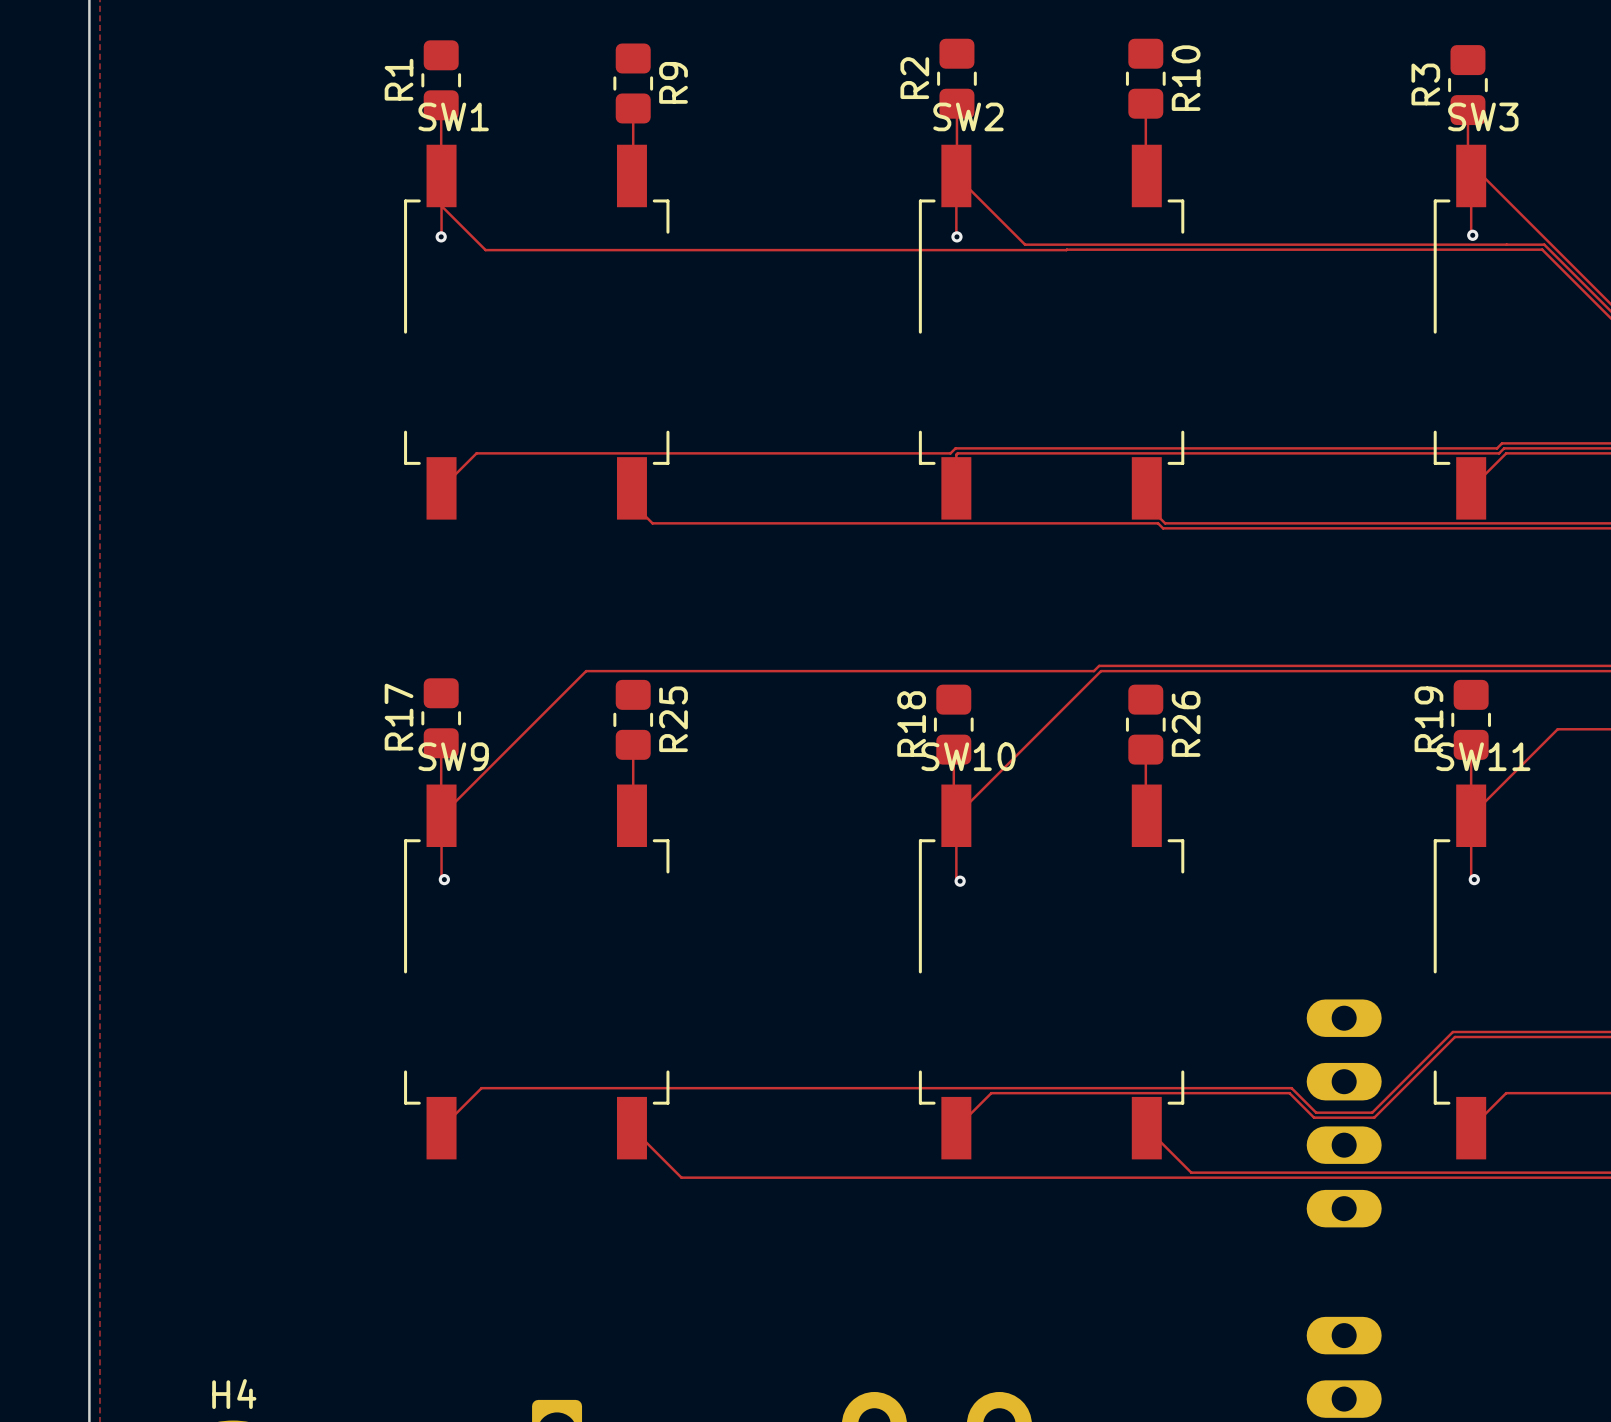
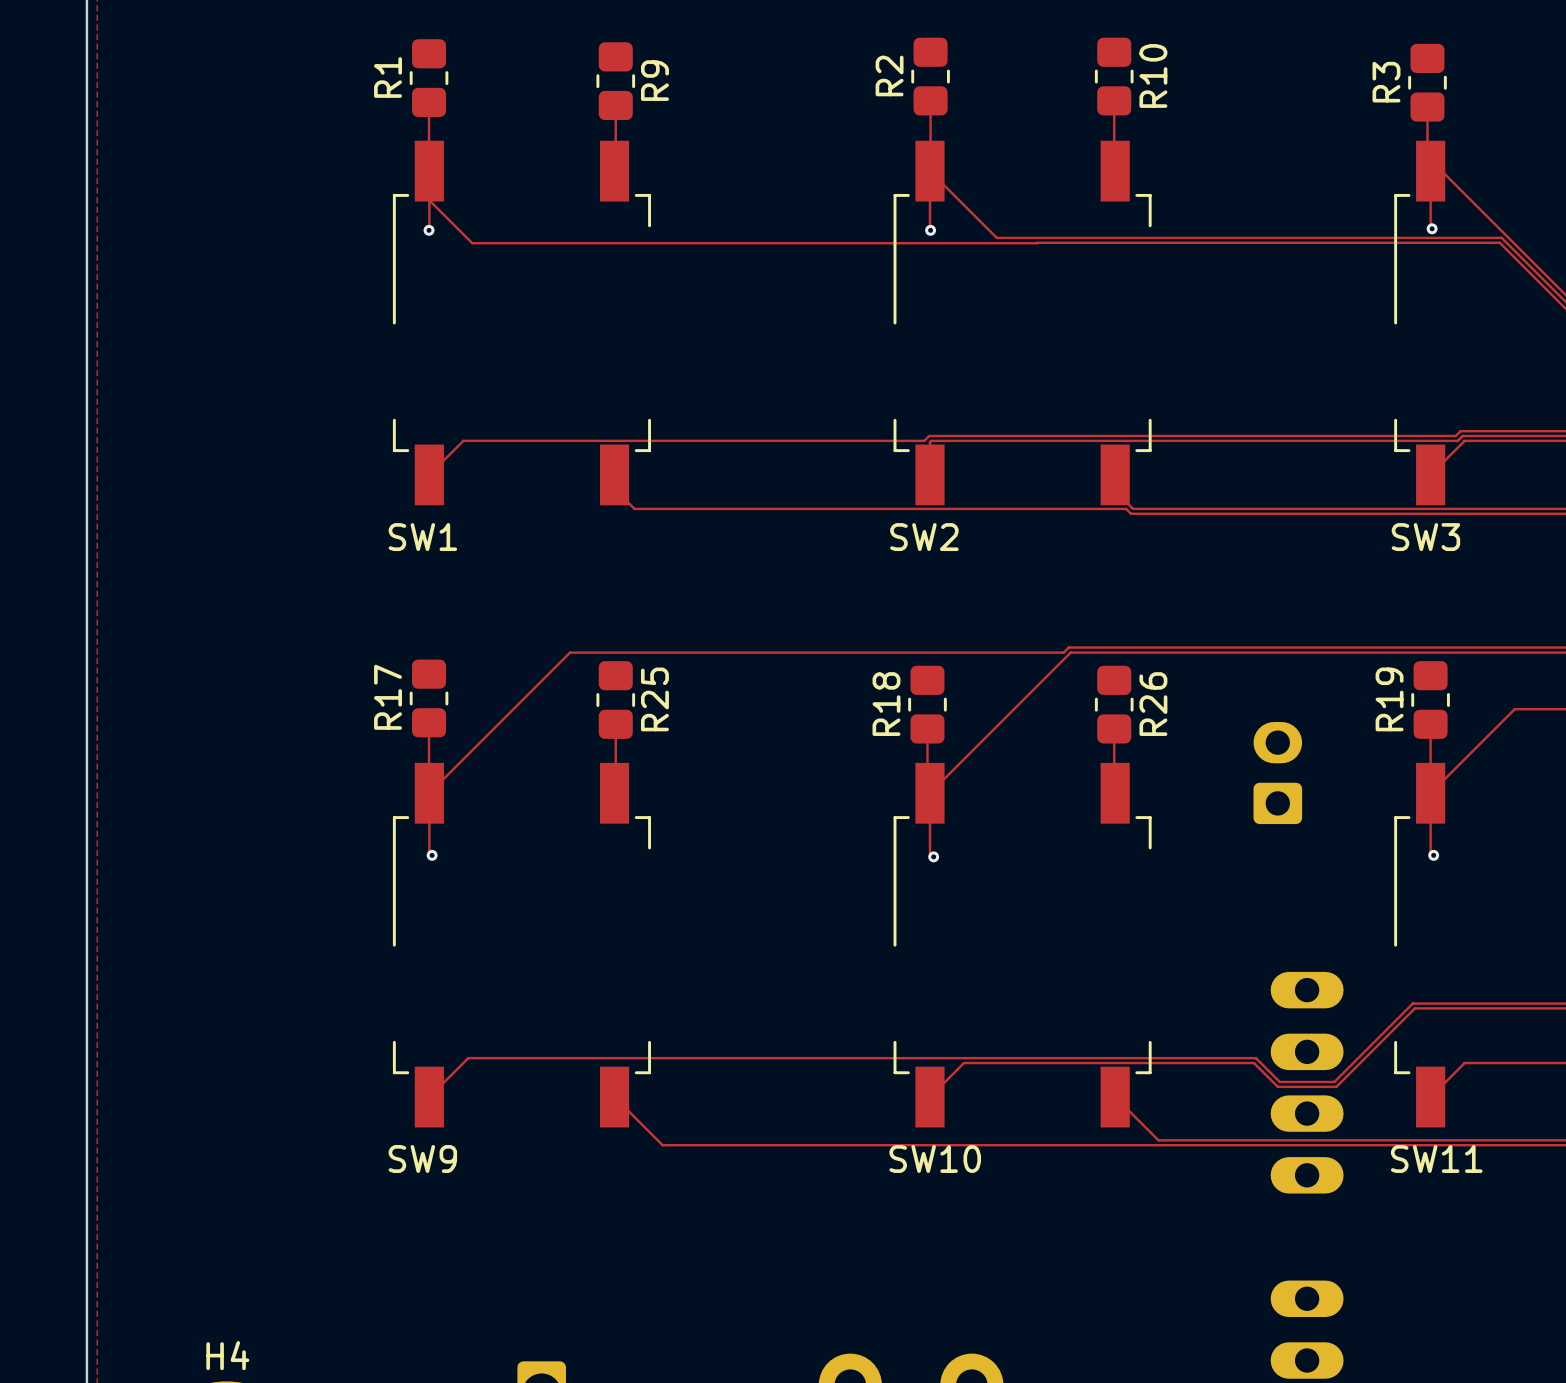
SW1 name position: SW1 (453, 116) -> SW1 (422, 537)
SW2 name position: SW2 (968, 116) -> SW2 (924, 537)
SW3 name position: SW3 (1483, 116) -> SW3 (1425, 537)
SW9 name position: SW9 (453, 756) -> SW9 (422, 1158)
SW10 name position: SW10 (968, 756) -> SW10 (935, 1158)
SW11 name position: SW11 (1483, 756) -> SW11 (1436, 1158)
part: none -> (1277, 773)

